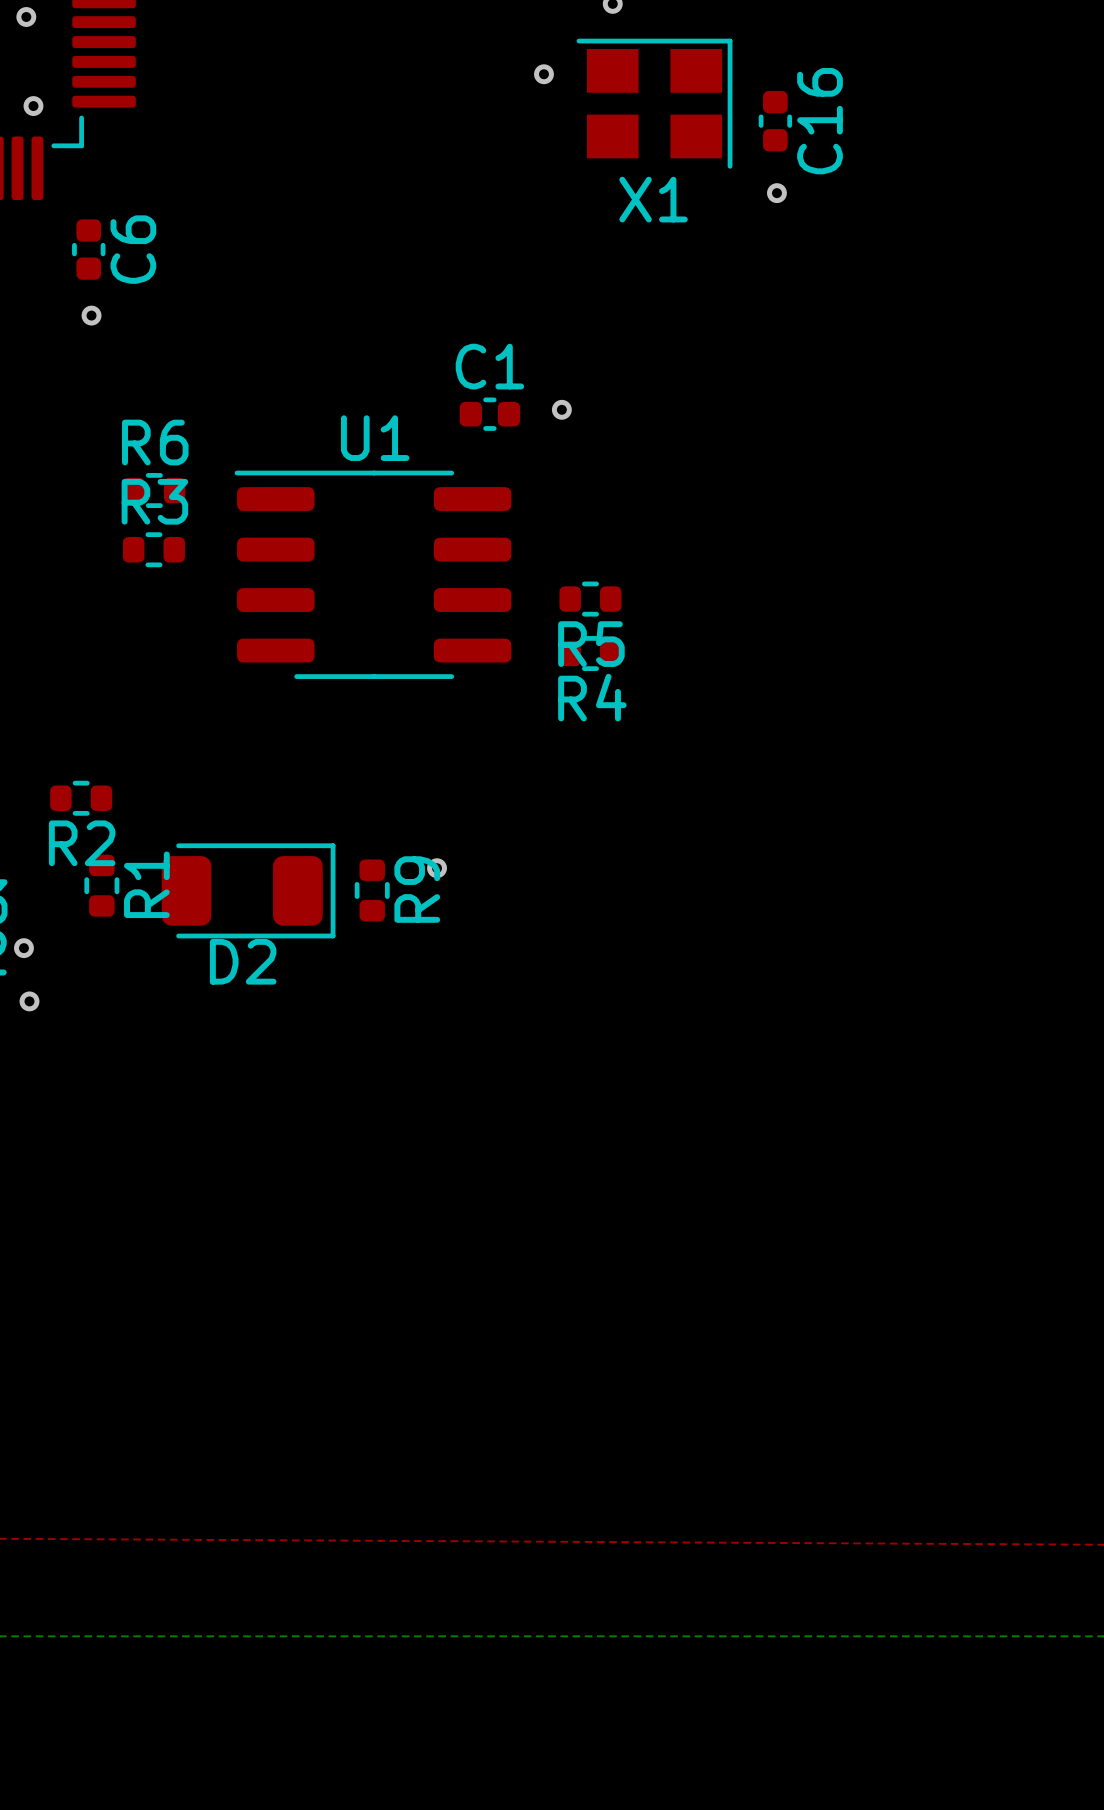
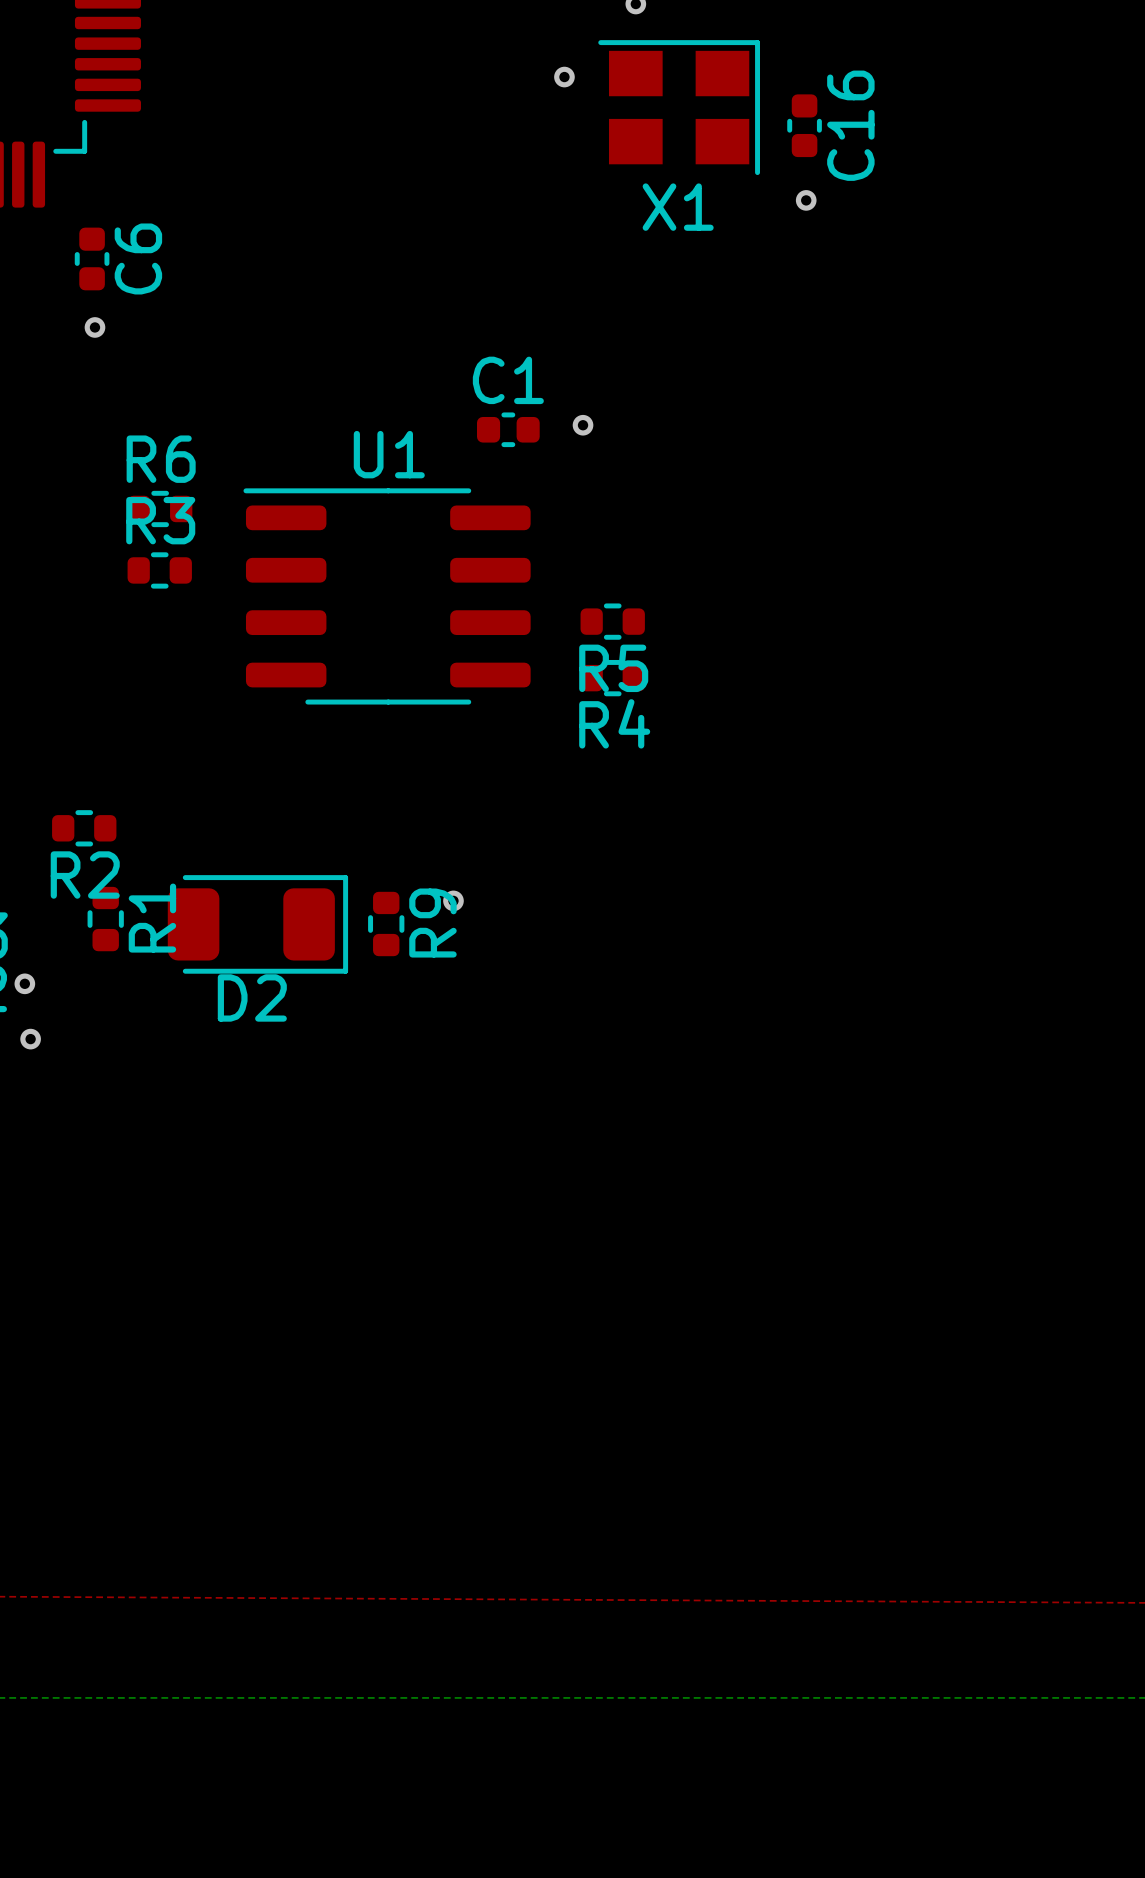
via: (26, 16) -> none
via: (33, 106) -> none

